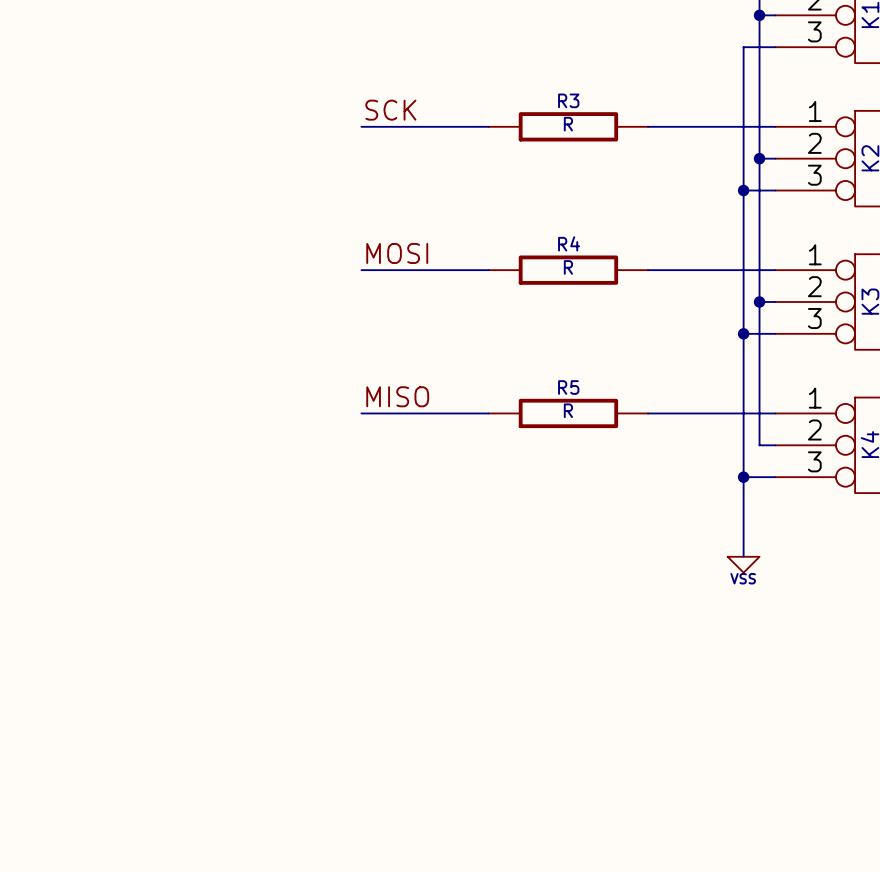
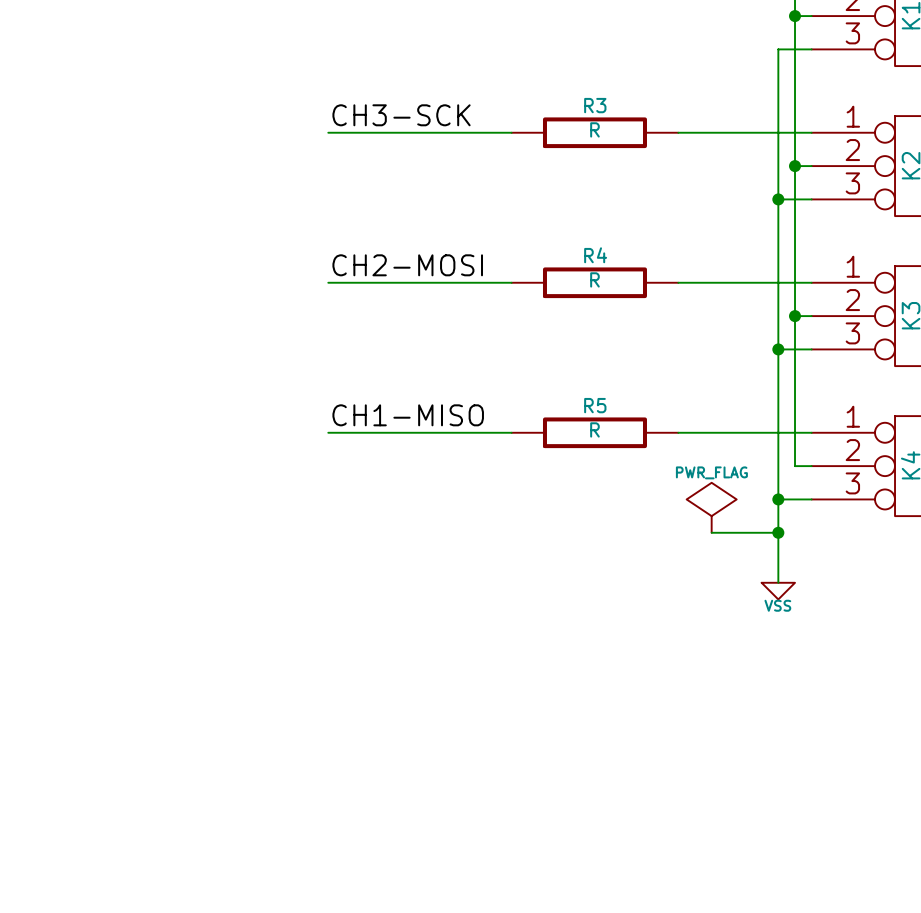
label: none -> CH3-SCK (401, 115)
label: SCK (390, 110) -> none
wire: none -> (328, 132) (378, 132)
label: MOSI (397, 253) -> CH2-MOSI (407, 265)
wire: none -> (328, 282) (378, 282)
label: MISO (397, 396) -> CH1-MISO (408, 415)
wire: none -> (328, 432) (378, 432)
power symbol: none -> PWR_FLAG (711, 507)
wire: none -> (711, 532) (778, 532)
junction: none -> (778, 532)

